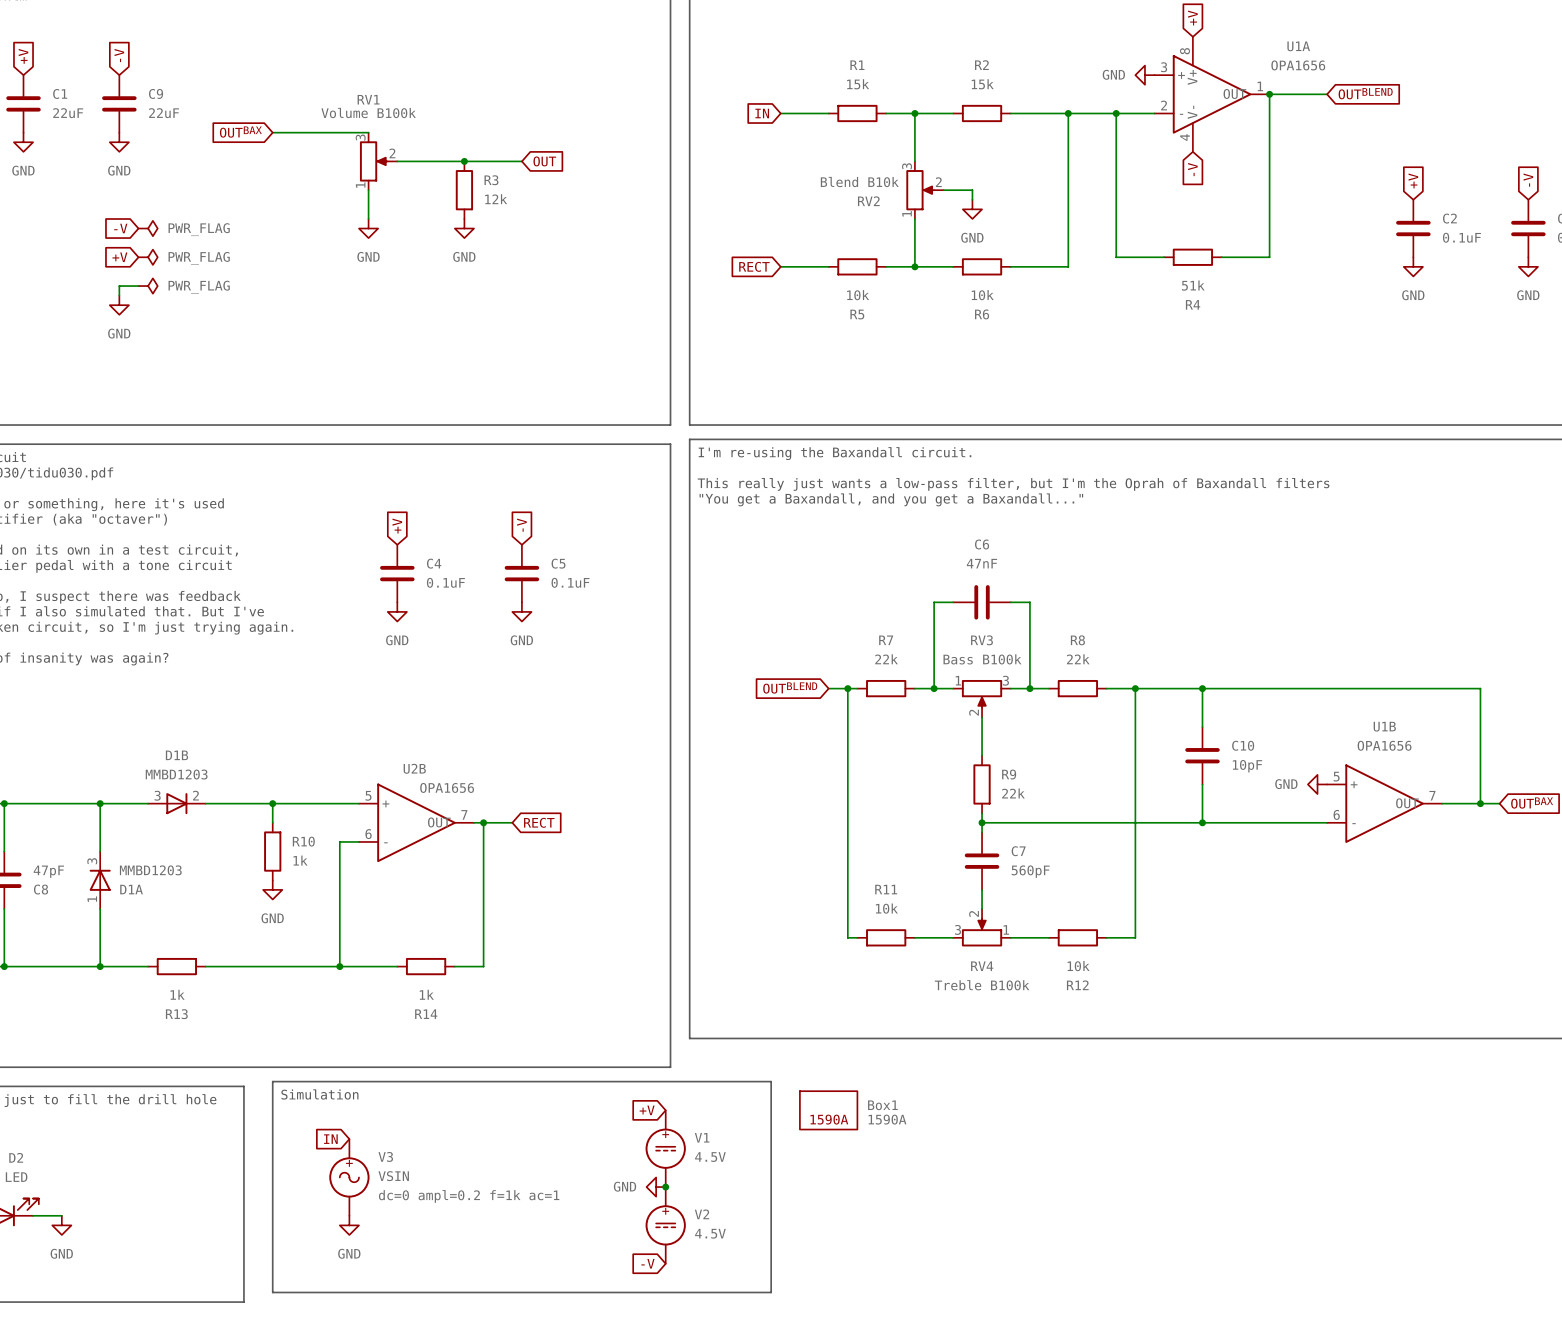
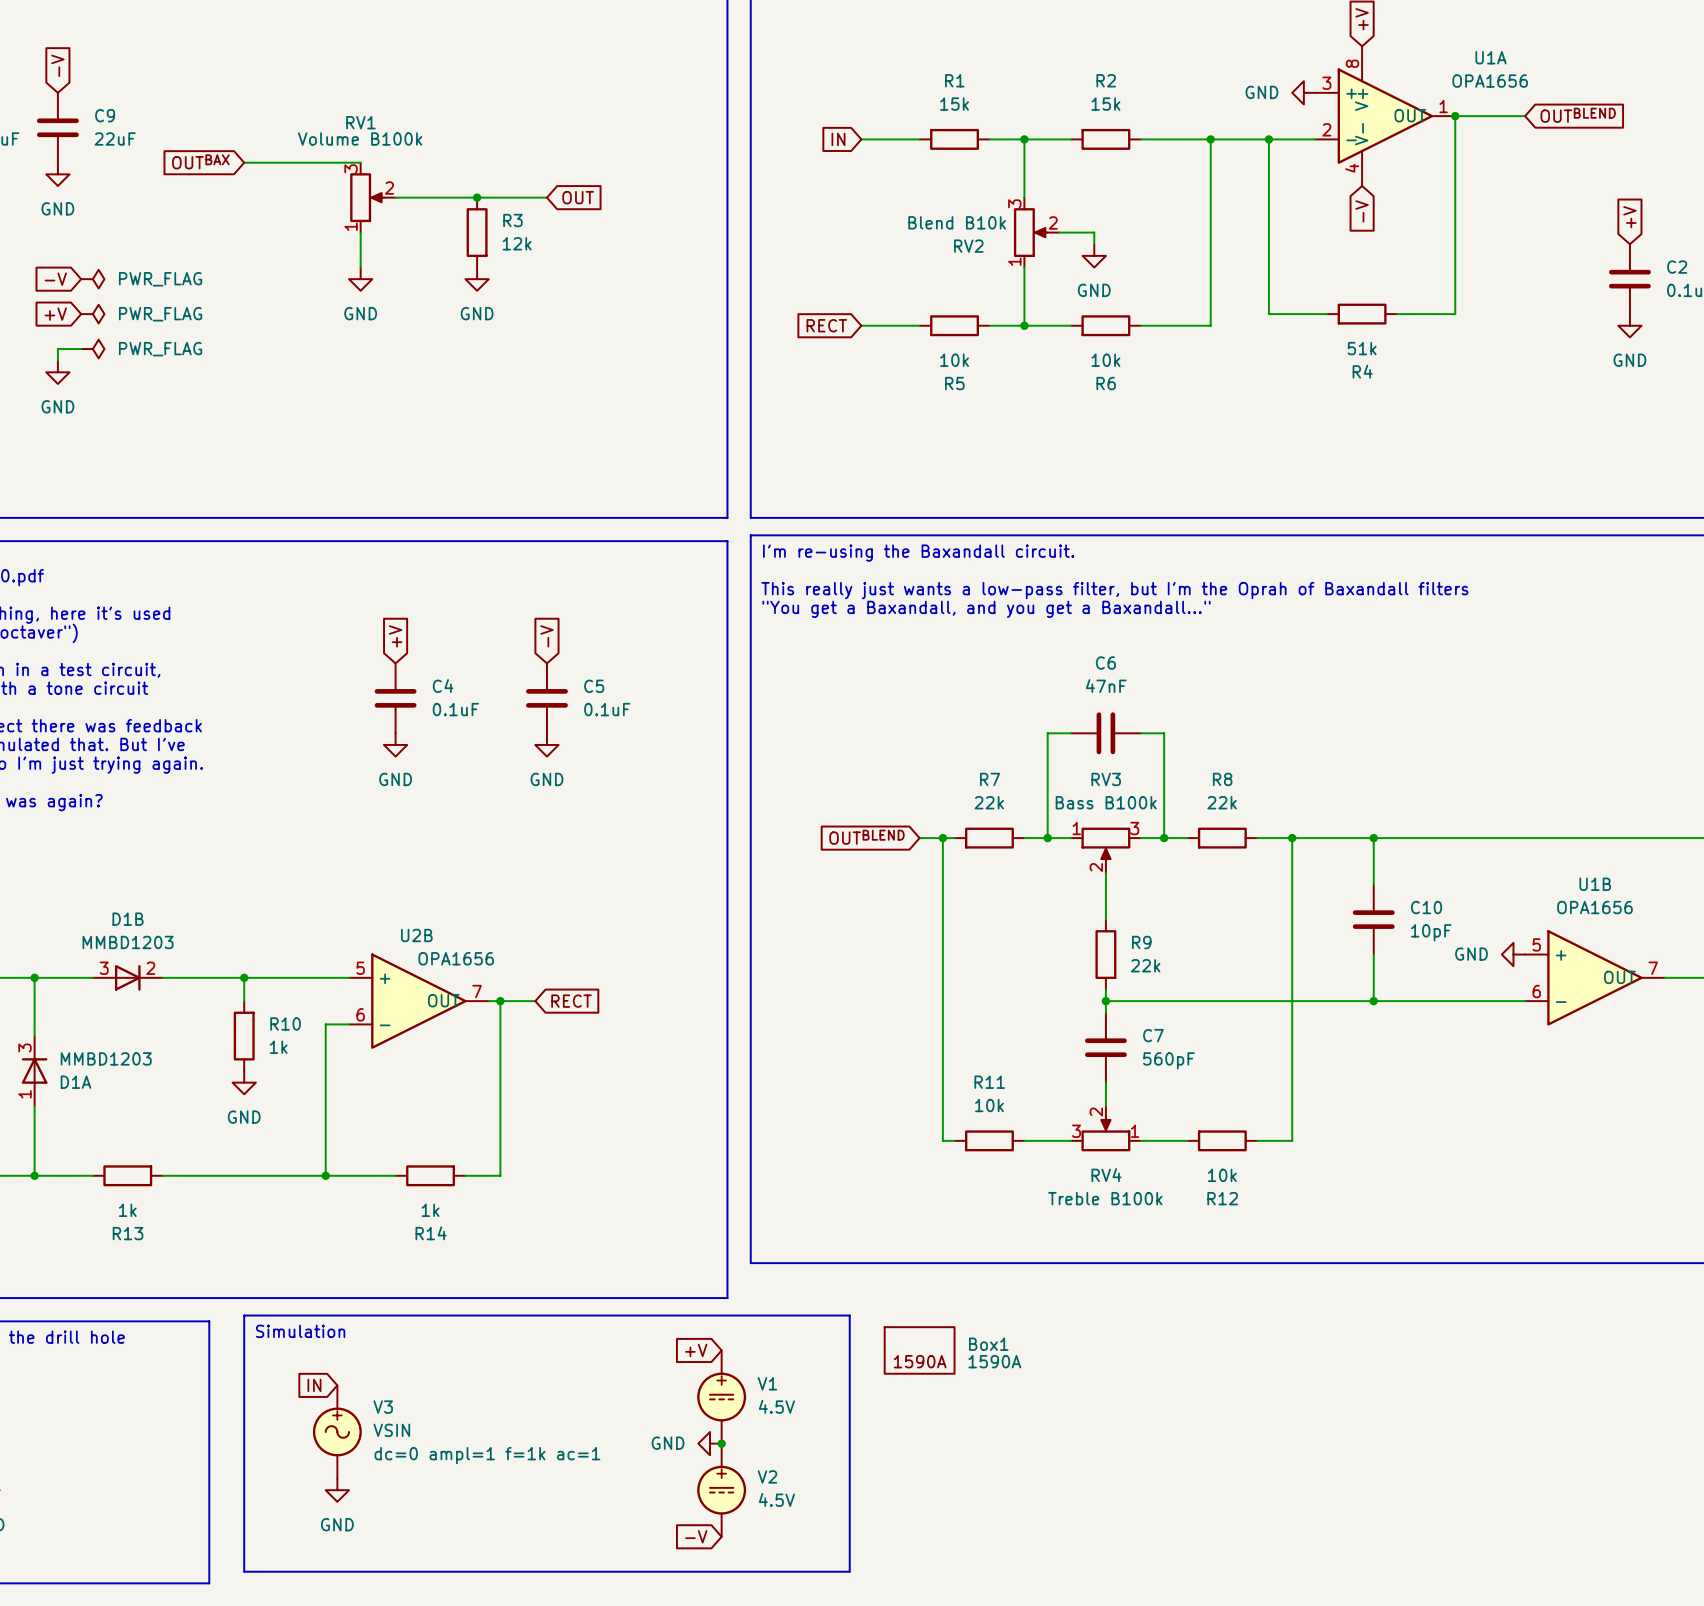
V3 text: dc=0 ampl=0.2 f=1k ac=1 (469, 1196) -> dc=0 ampl=1 f=1k ac=1 (487, 1455)

